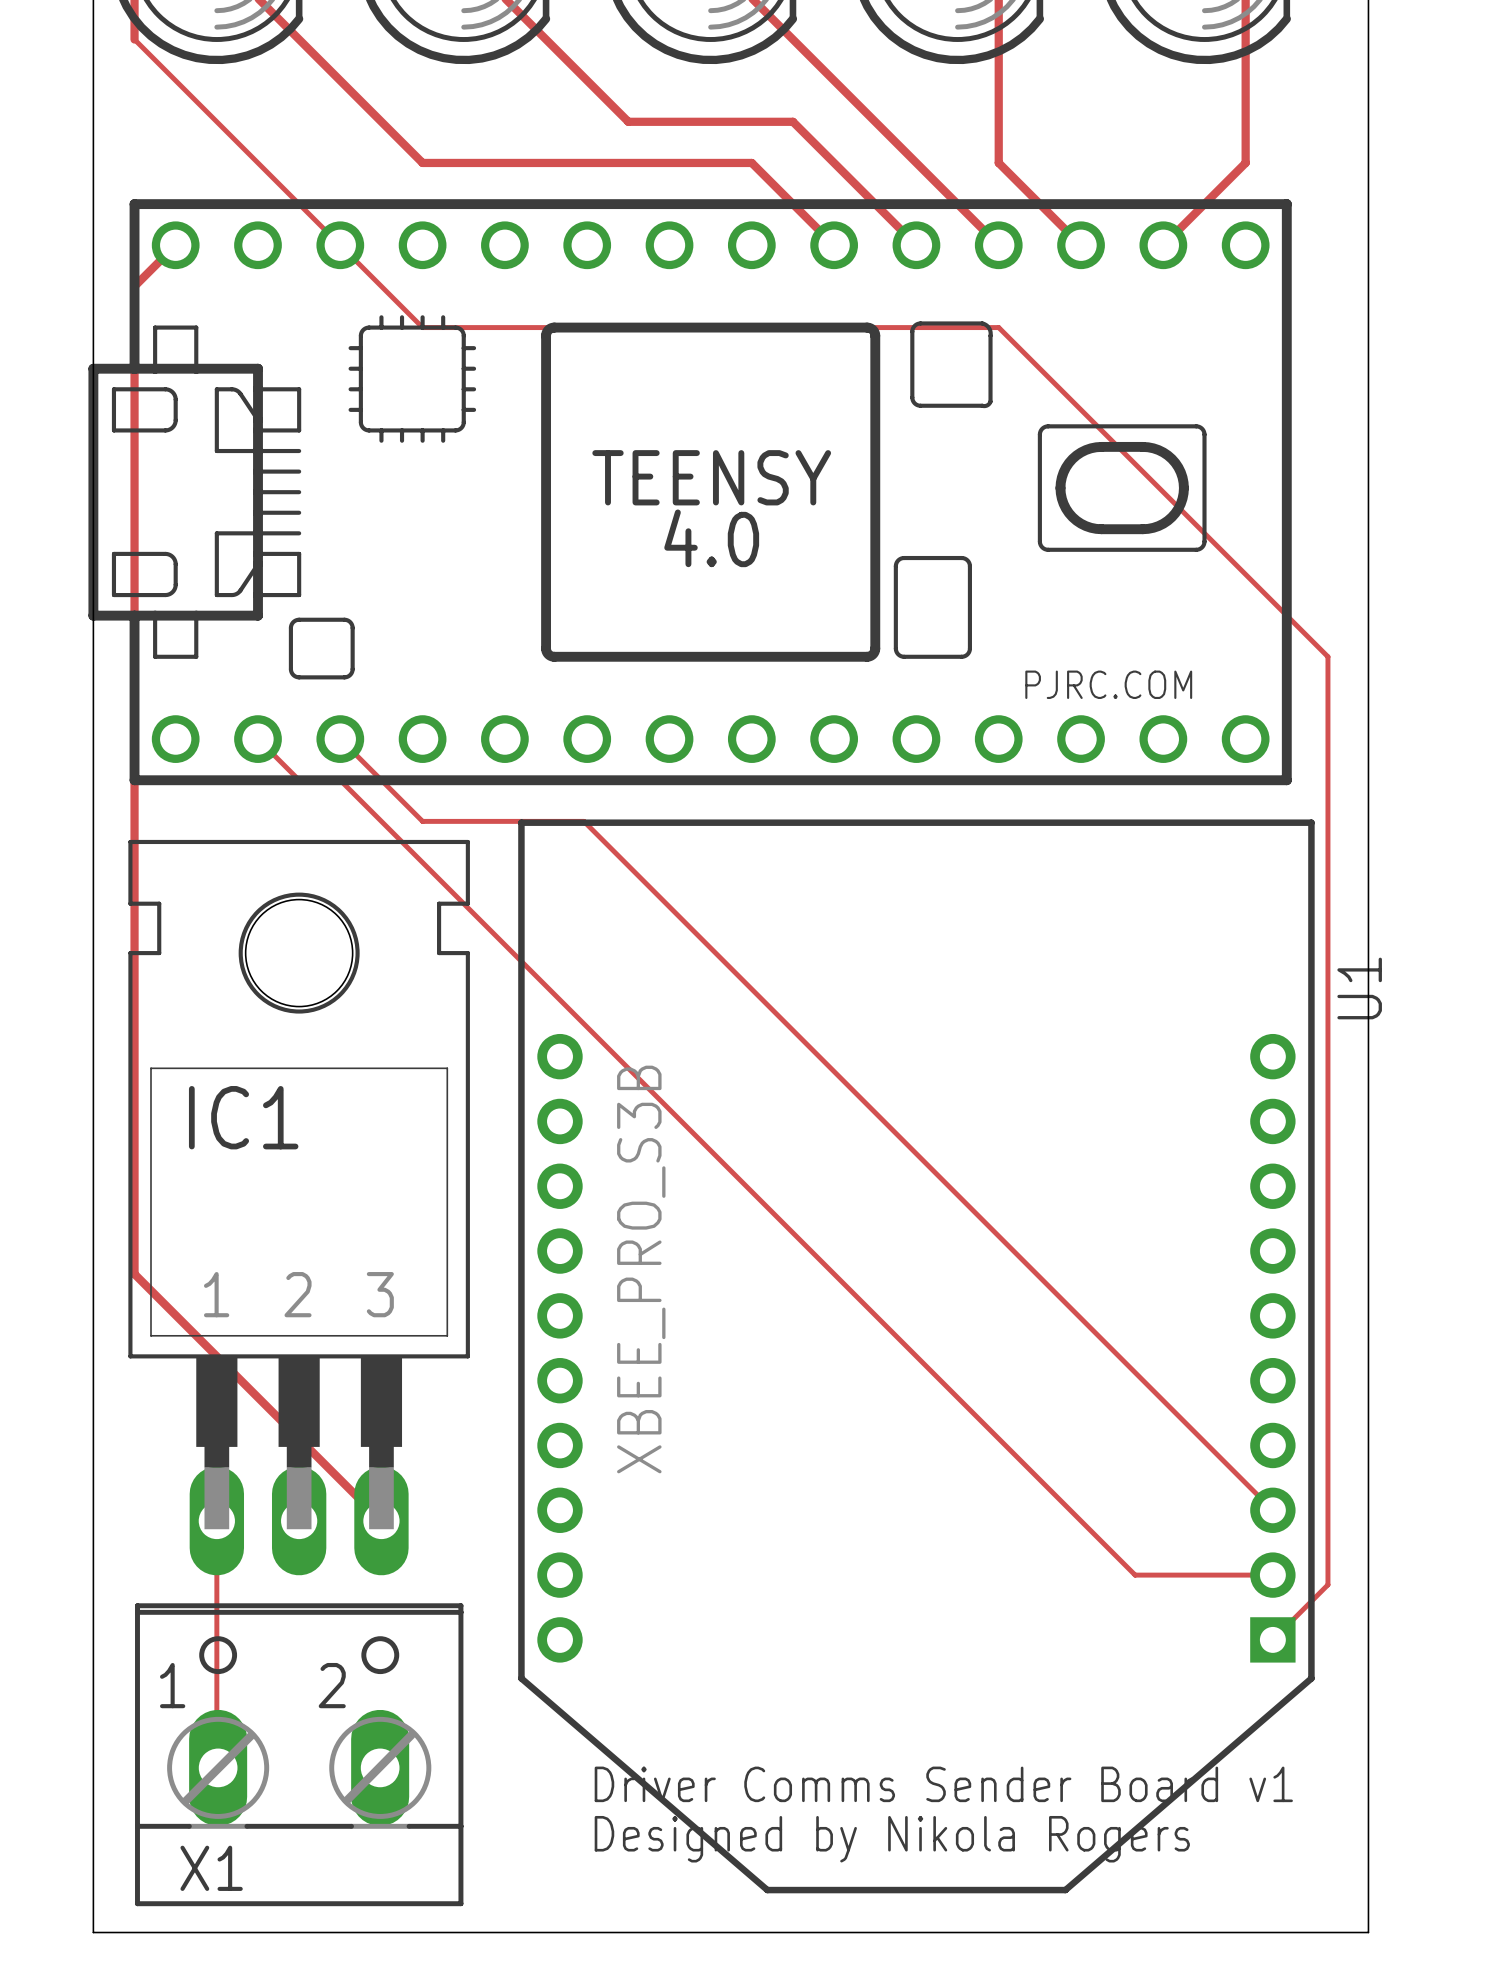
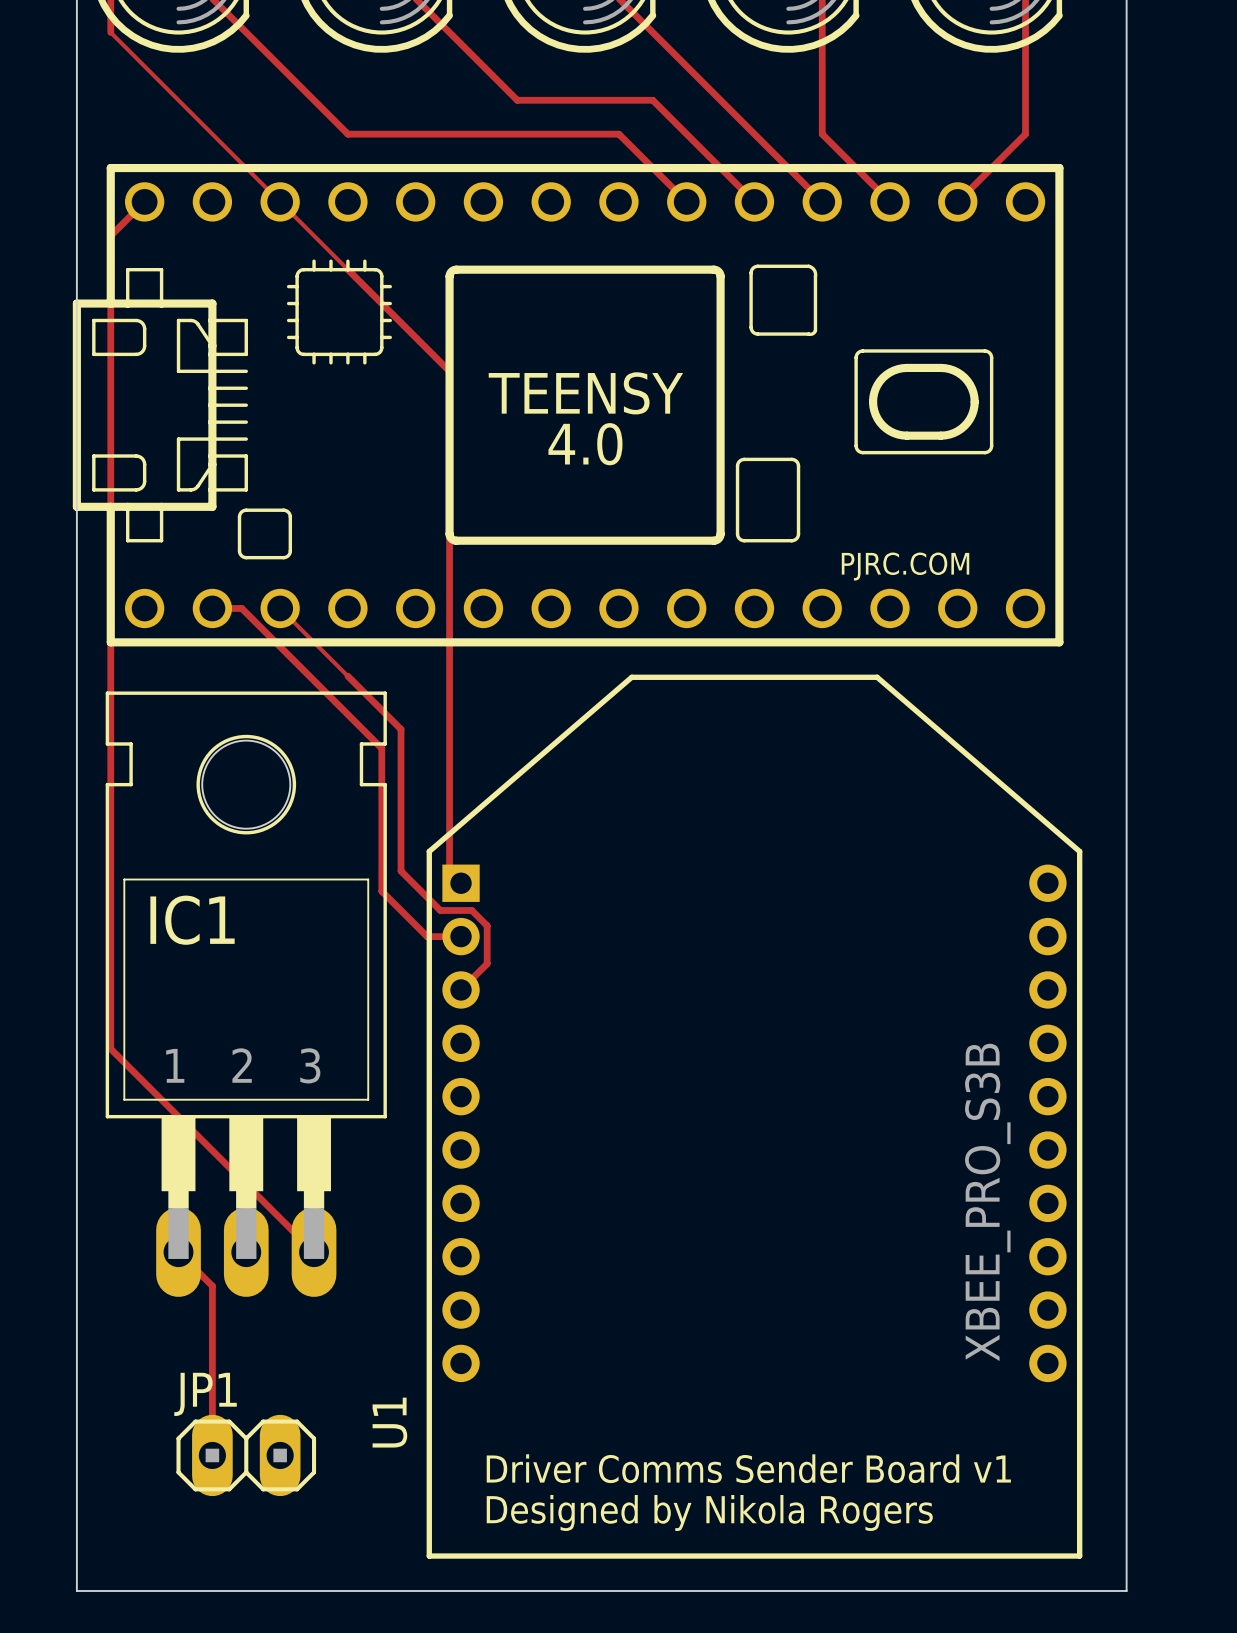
track: (422, 327) (998, 327) (1327, 656) (1327, 1584) (1272, 1639) -> (347, 269) (449, 371) (449, 871) (461, 883)
track: (257, 739) (299, 780) (340, 780) (1135, 1575) (1272, 1575) -> (212, 608) (241, 608) (381, 748) (381, 891) (427, 936) (461, 936)
track: (422, 821) (583, 821) (1272, 1510) -> (347, 676) (401, 729) (401, 871) (440, 910) (471, 910) (487, 925) (487, 963) (461, 989)
U1 rotation: 0° (916, 1356) -> 180° (754, 1116)
track: (216, 1520) (218, 1767) -> (178, 1252) (212, 1286) (212, 1455)
X1: (299, 1754) -> none
JP1: none -> (246, 1455)

